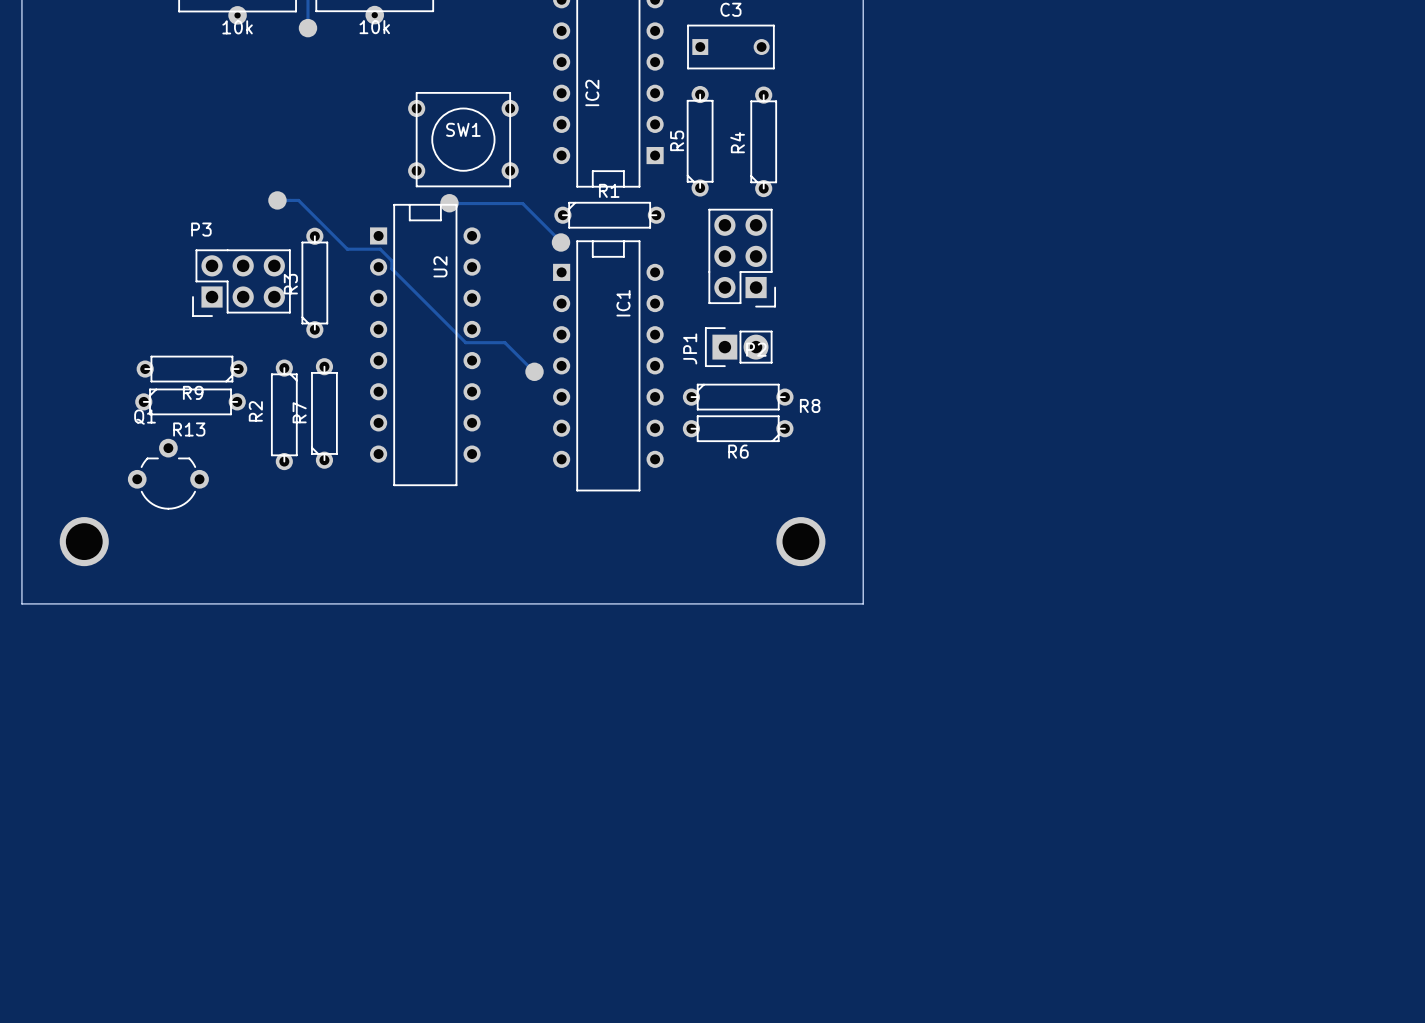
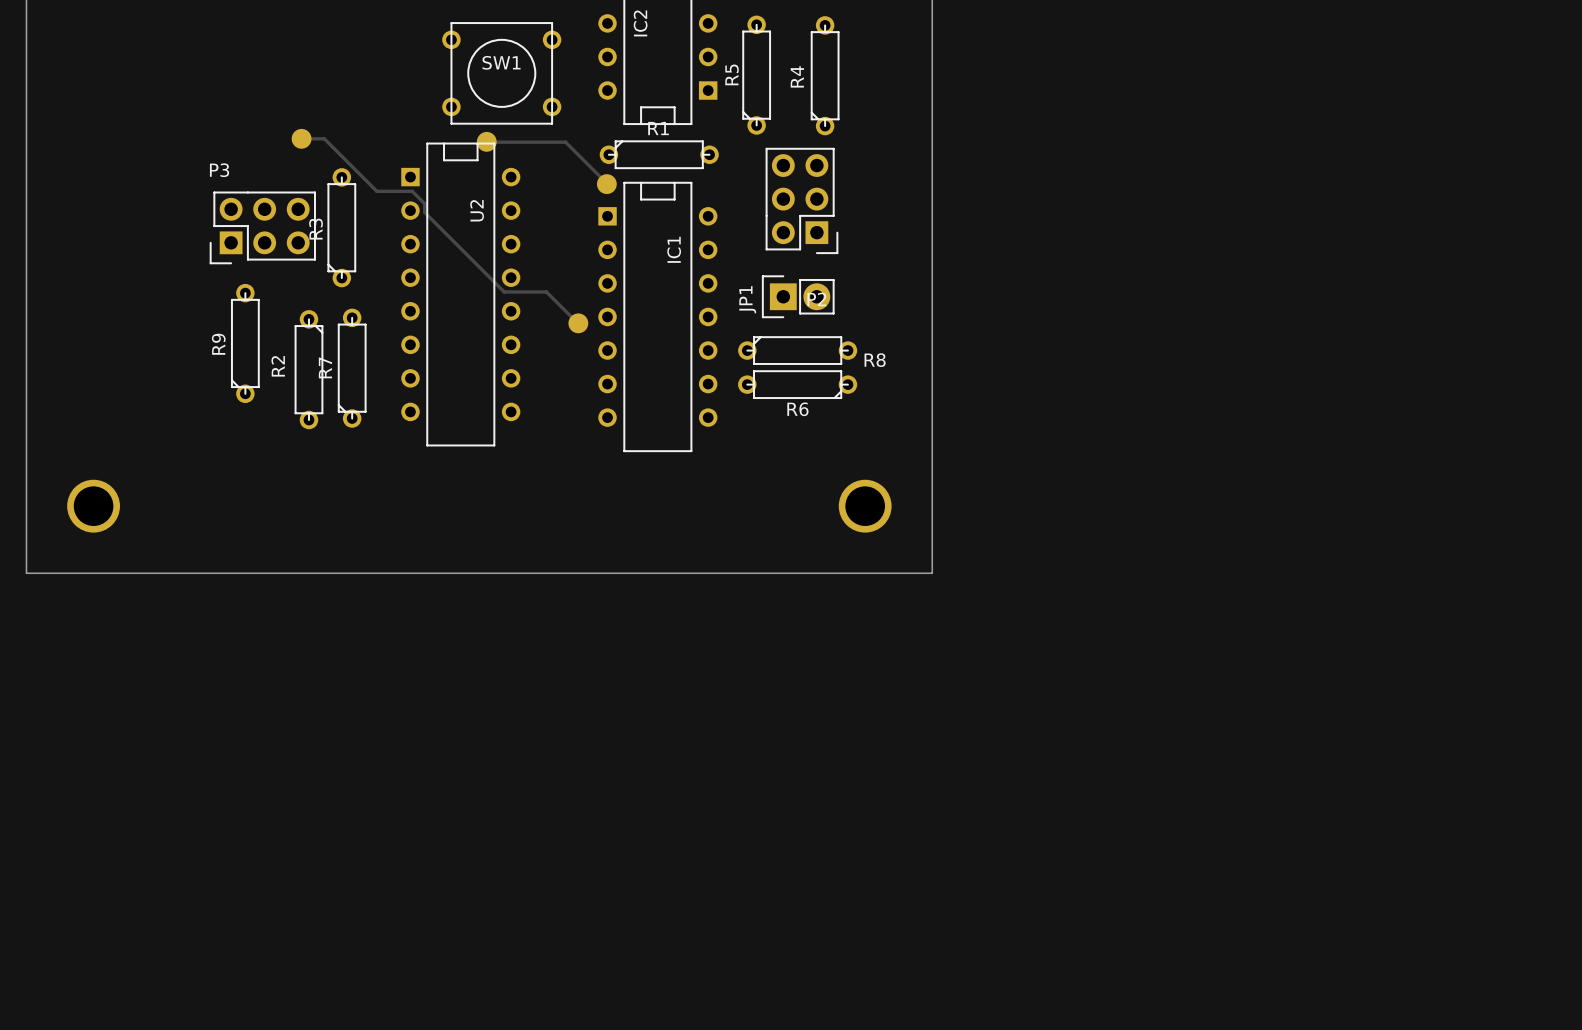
R9 rotation: 0° (191, 369) -> 90° clockwise (245, 343)
R13: (190, 401) -> none
Q1: (168, 474) -> none

